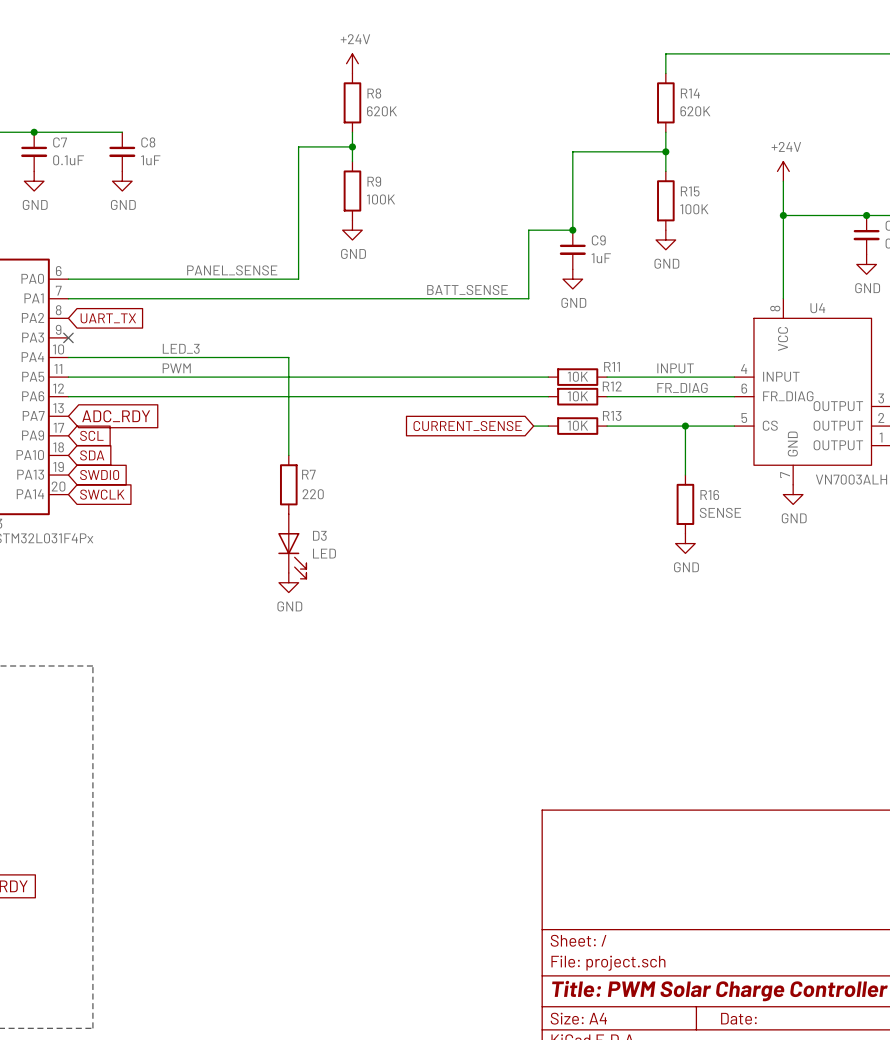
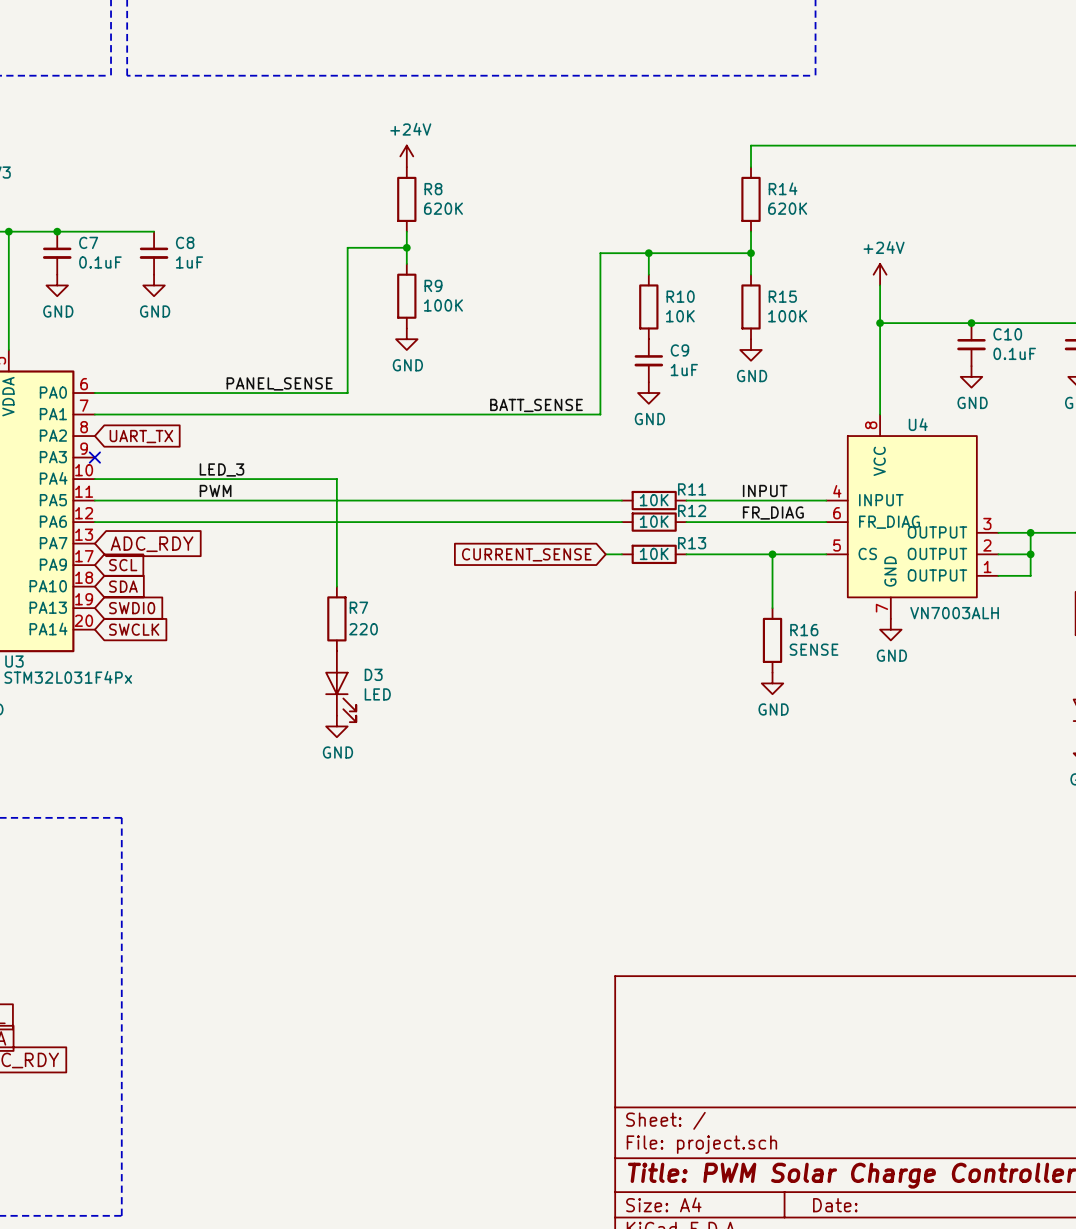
junction: none -> (648, 253)
wire: (572, 171) (572, 230) (528, 230) -> (648, 253) (600, 253) (600, 339)
R10: none -> 10K (648, 306)
junction: (572, 230) -> none

